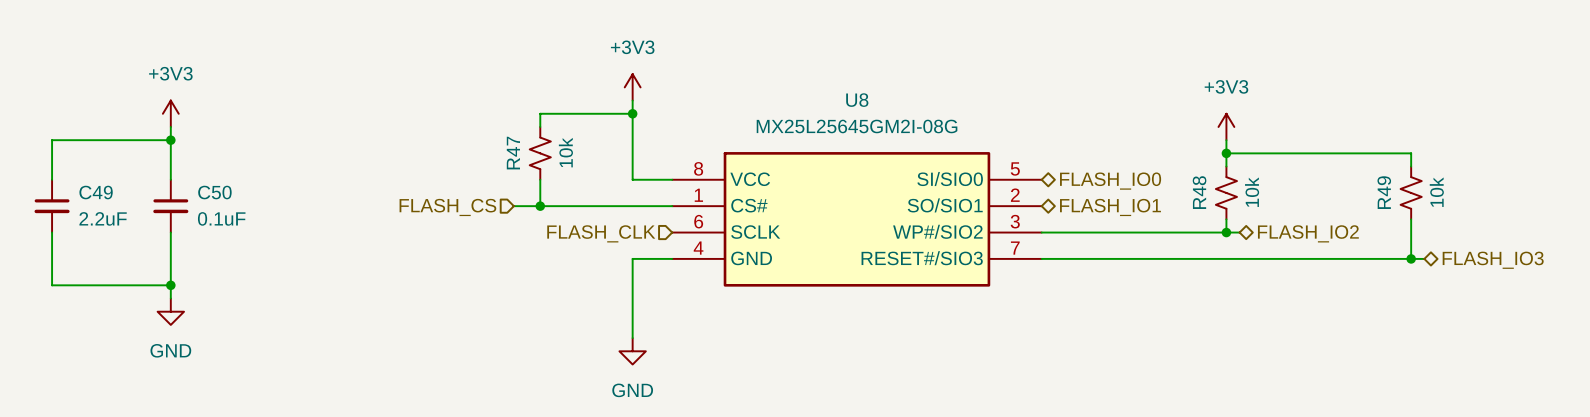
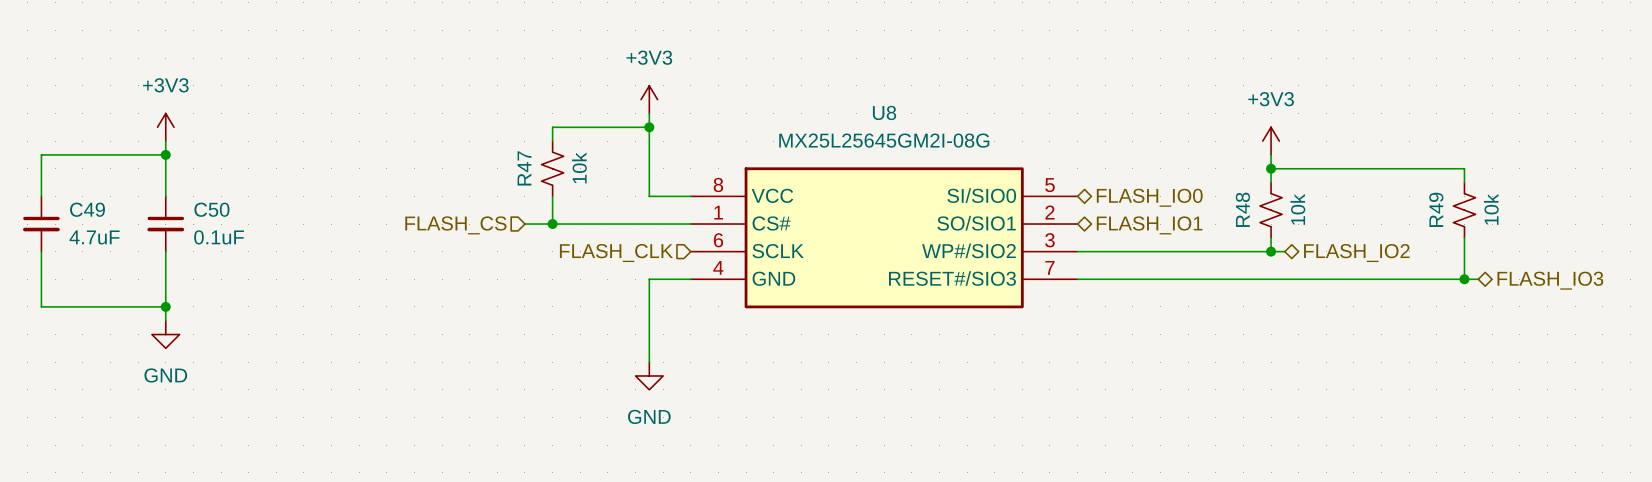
C49 value: 2.2uF (103, 218) -> 4.7uF (94, 237)

